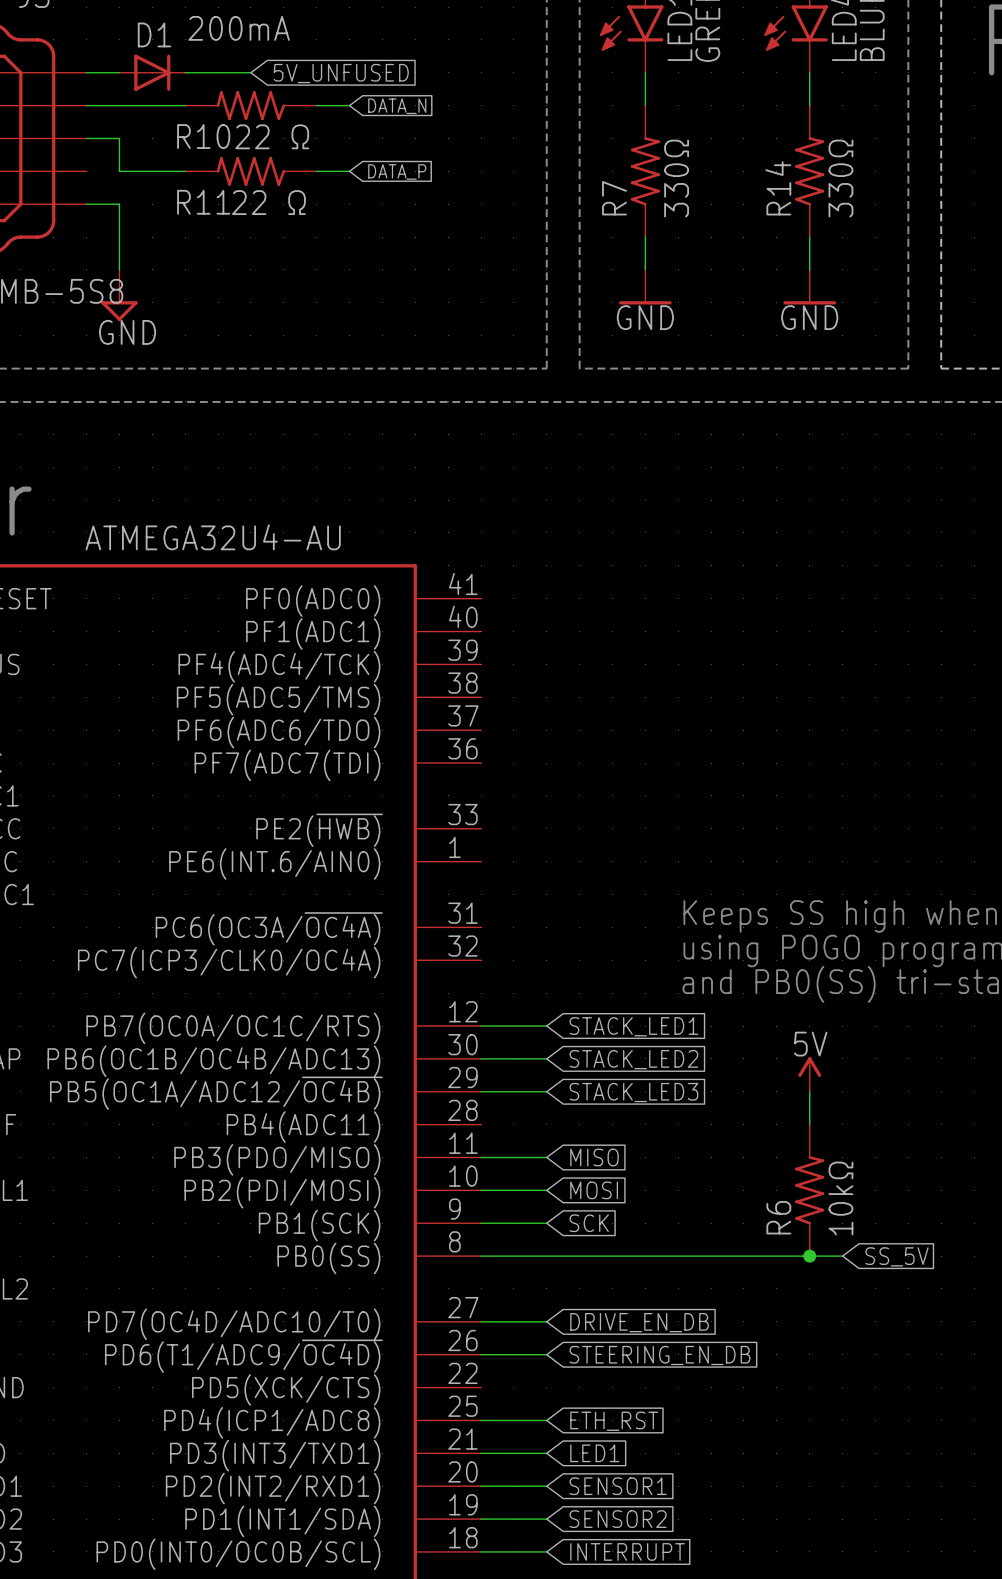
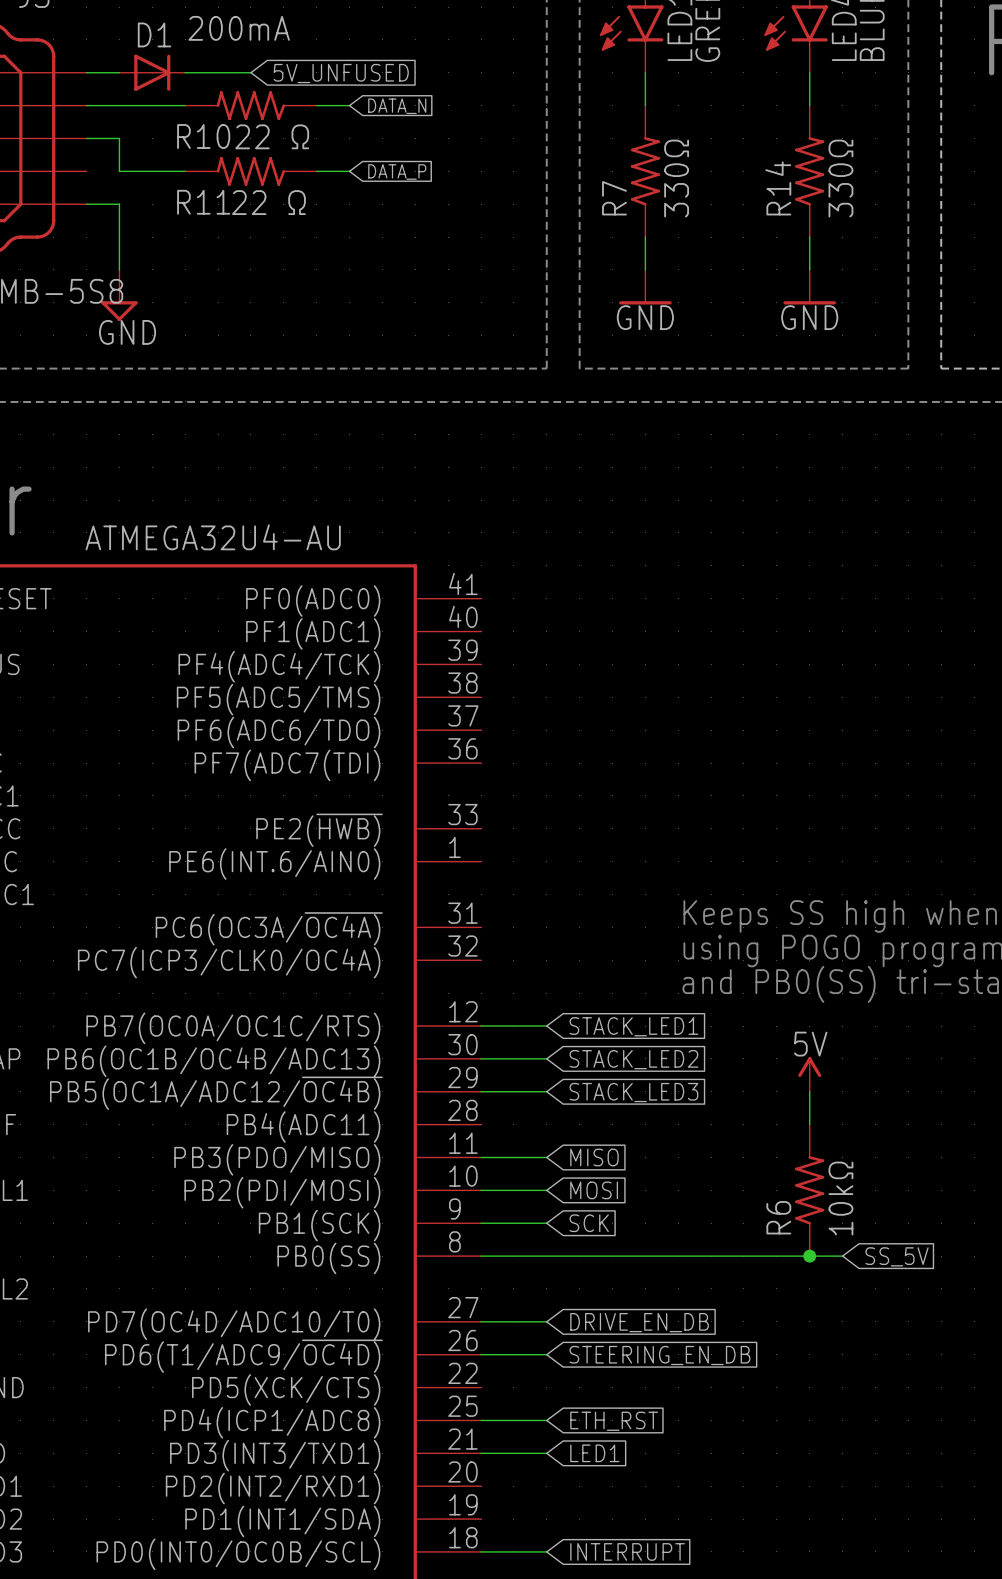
wire: (481, 1486) (546, 1486) -> none
global label: SENSOR1 (618, 1486) -> none
wire: (481, 1519) (546, 1519) -> none
global label: SENSOR2 (618, 1519) -> none

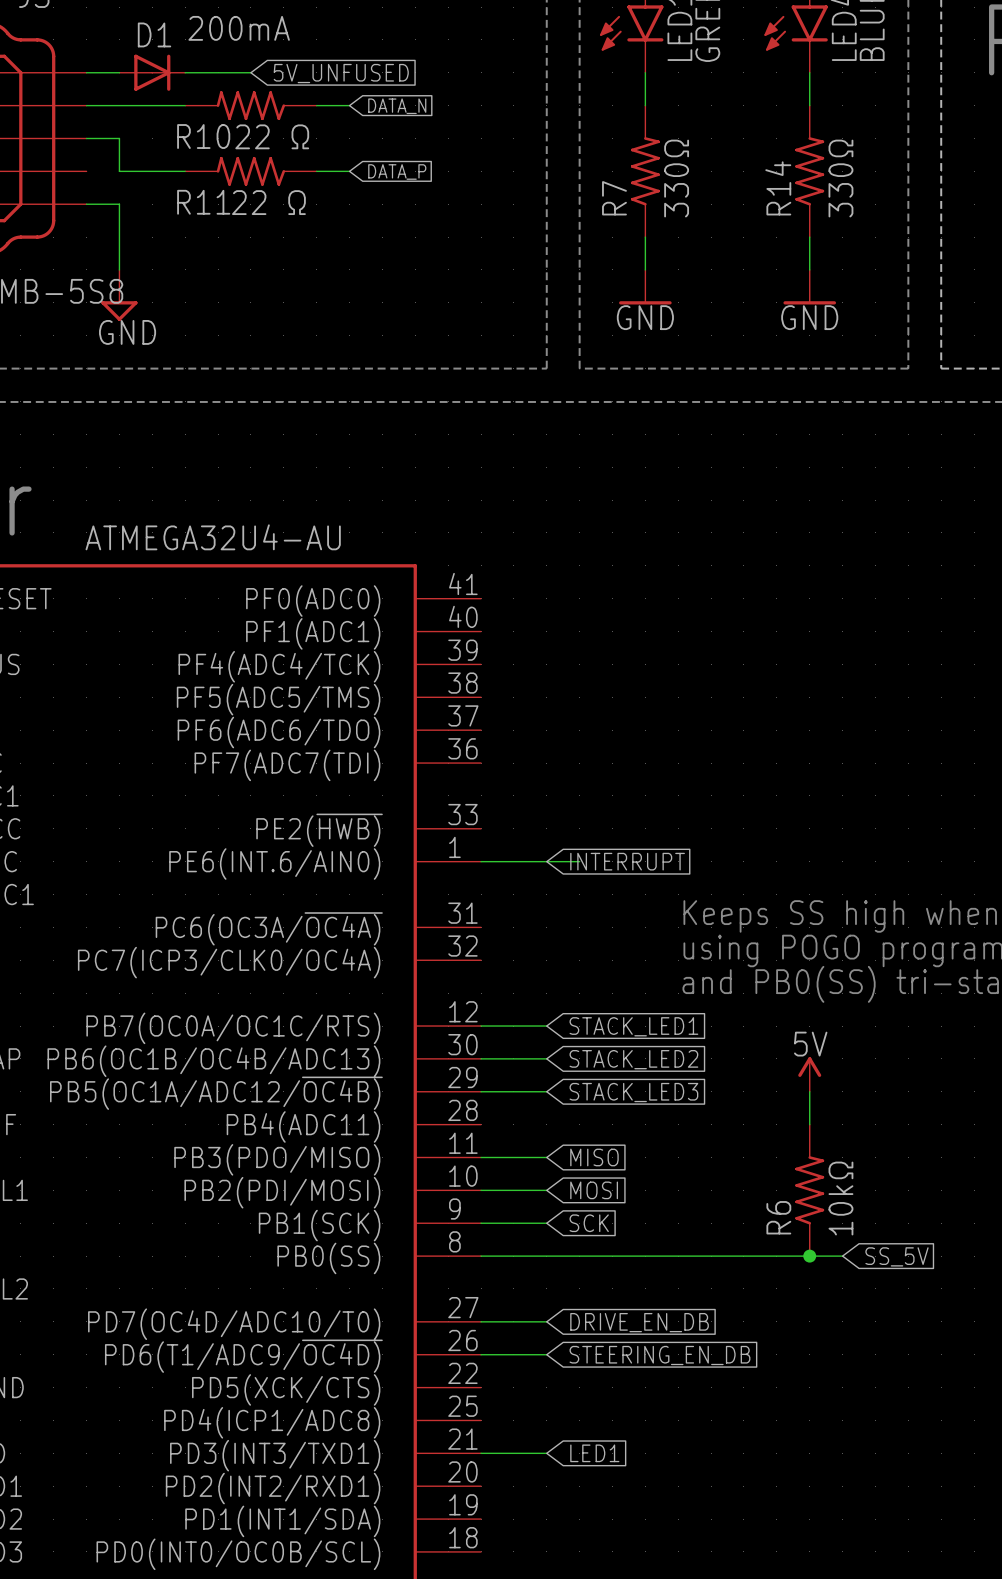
wire: none -> (481, 861) (579, 861)
global label: none -> INTERRUPT (627, 861)
wire: (481, 1420) (546, 1420) -> none
global label: ETH_RST (614, 1421) -> none
wire: (481, 1551) (546, 1551) -> none
global label: INTERRUPT (627, 1551) -> none

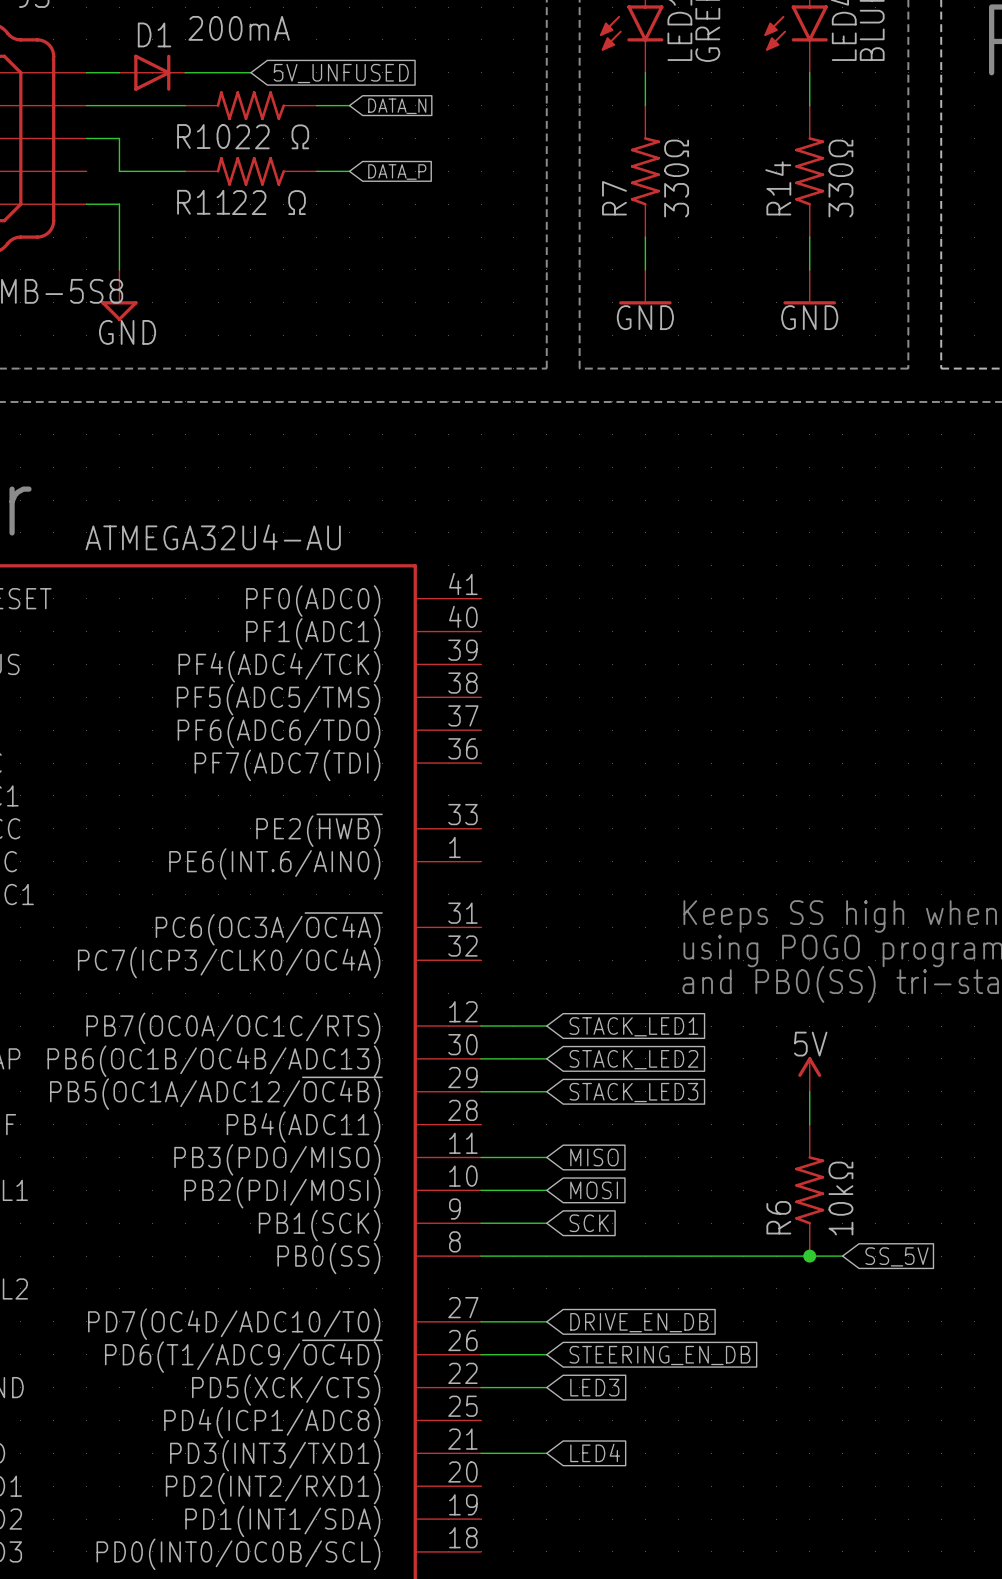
wire: (481, 861) (579, 861) -> none
global label: INTERRUPT (627, 861) -> none
wire: none -> (481, 1387) (546, 1387)
global label: none -> LED3 (594, 1387)
global label: LED1 (594, 1453) -> LED4 (595, 1452)

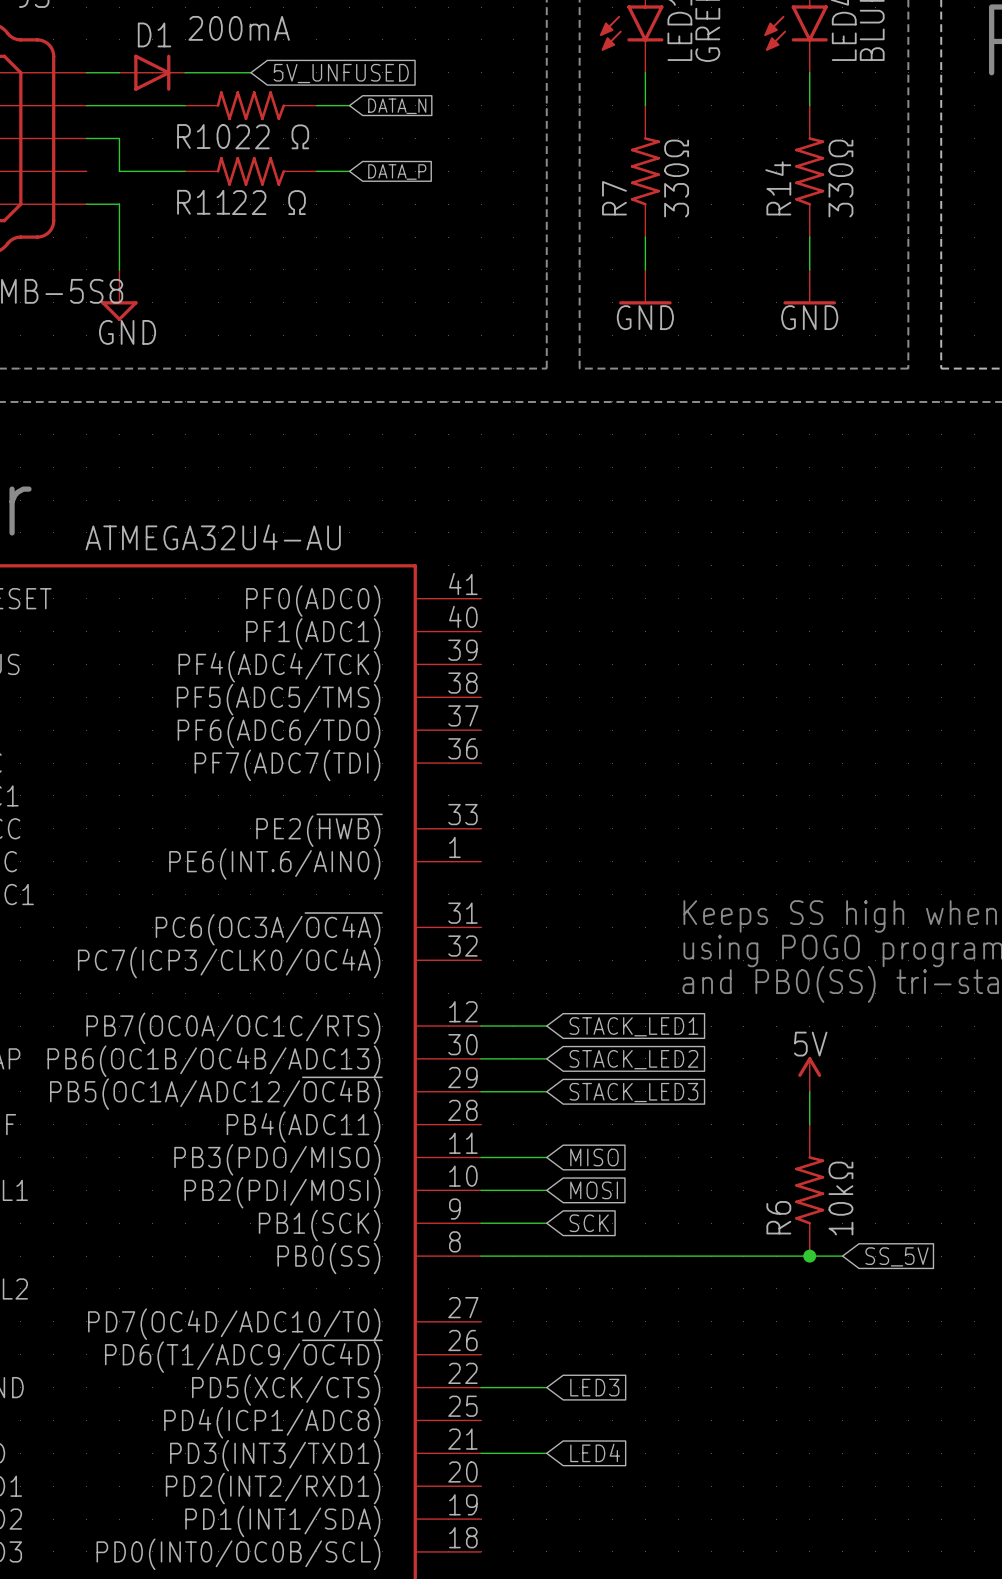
wire: (481, 1321) (546, 1321) -> none
global label: DRIVE_EN_DB (639, 1322) -> none
wire: (481, 1354) (546, 1354) -> none
global label: STEERING_EN_DB (659, 1355) -> none

